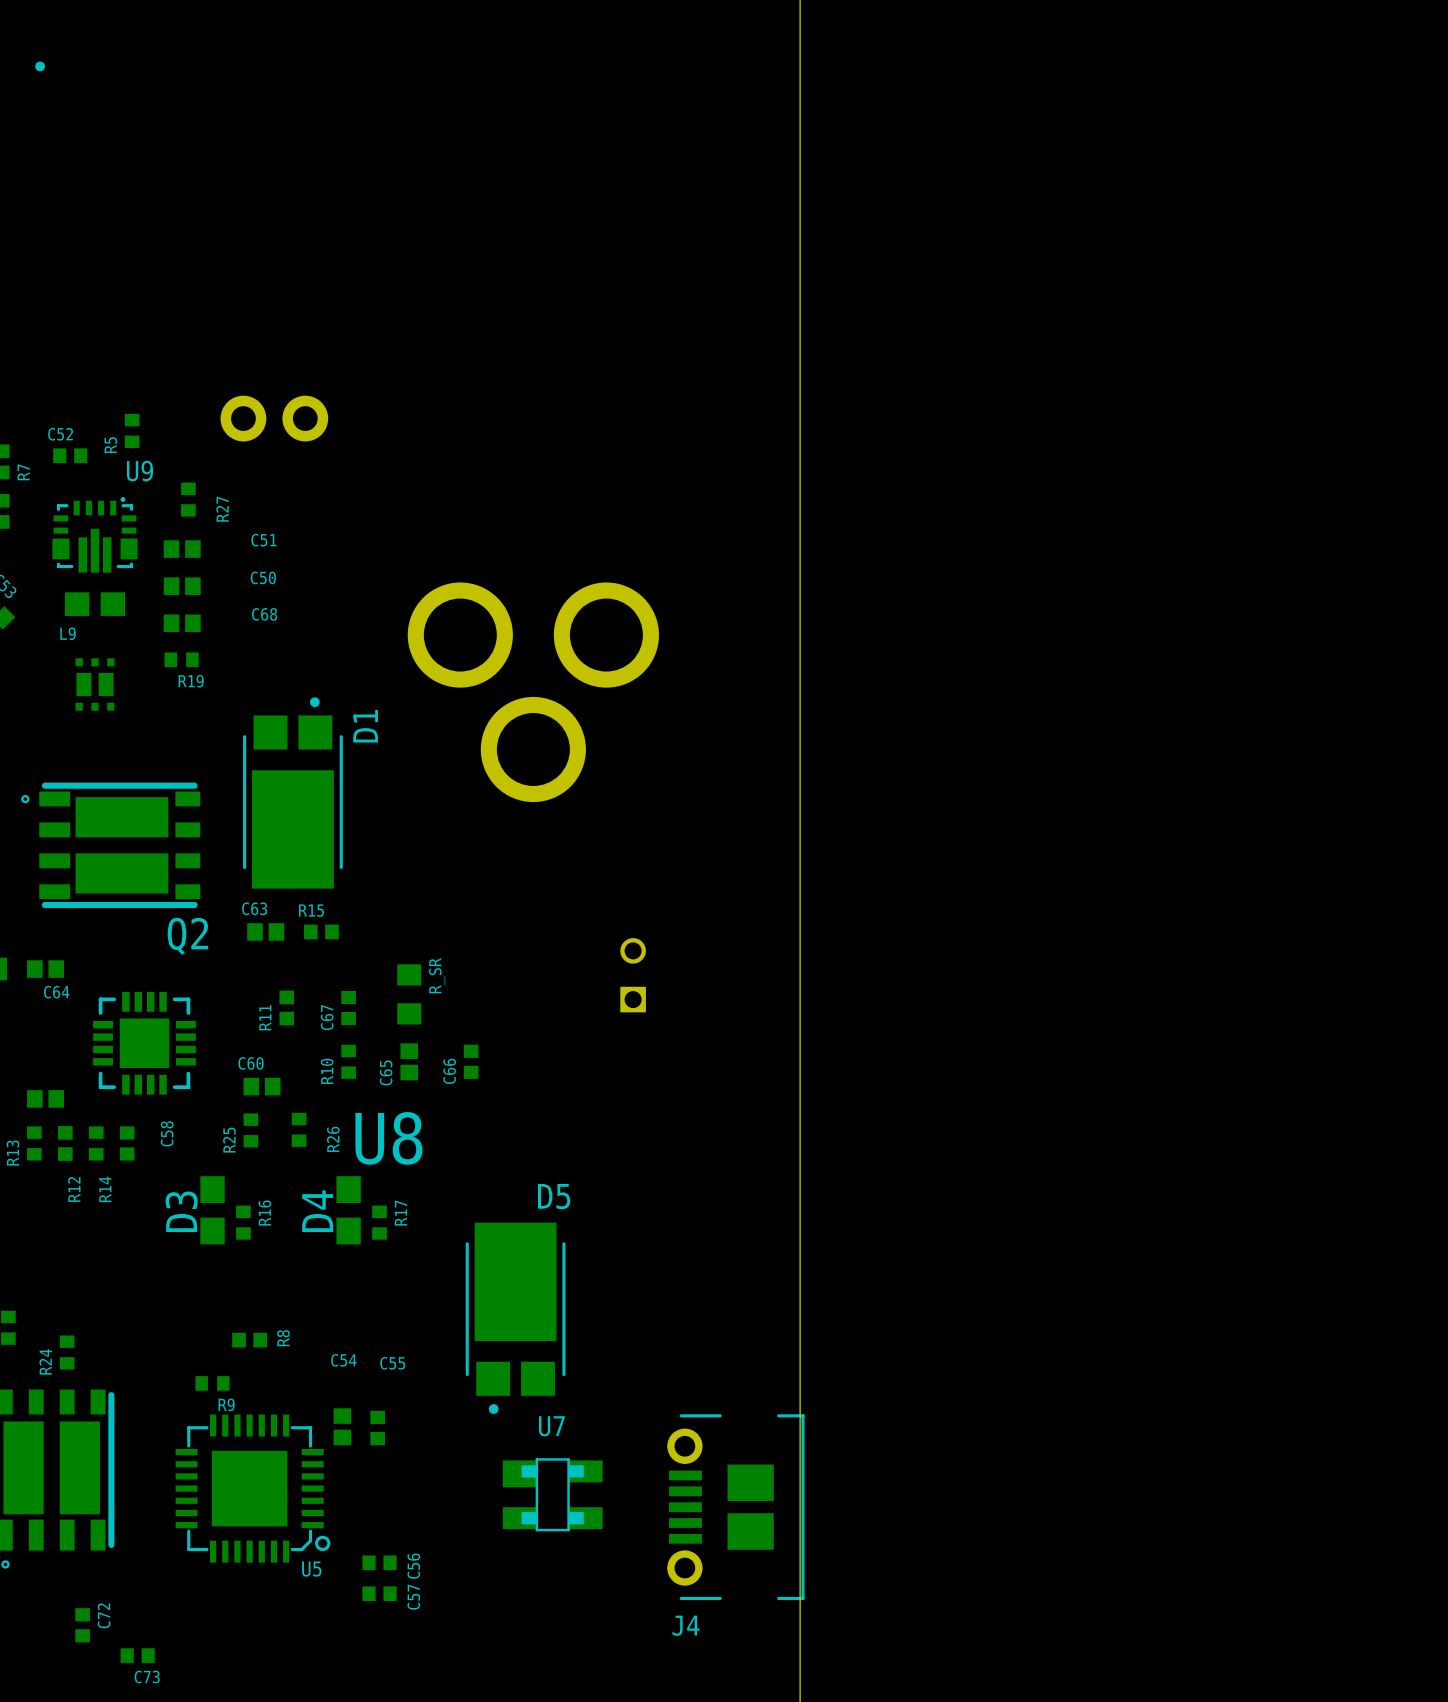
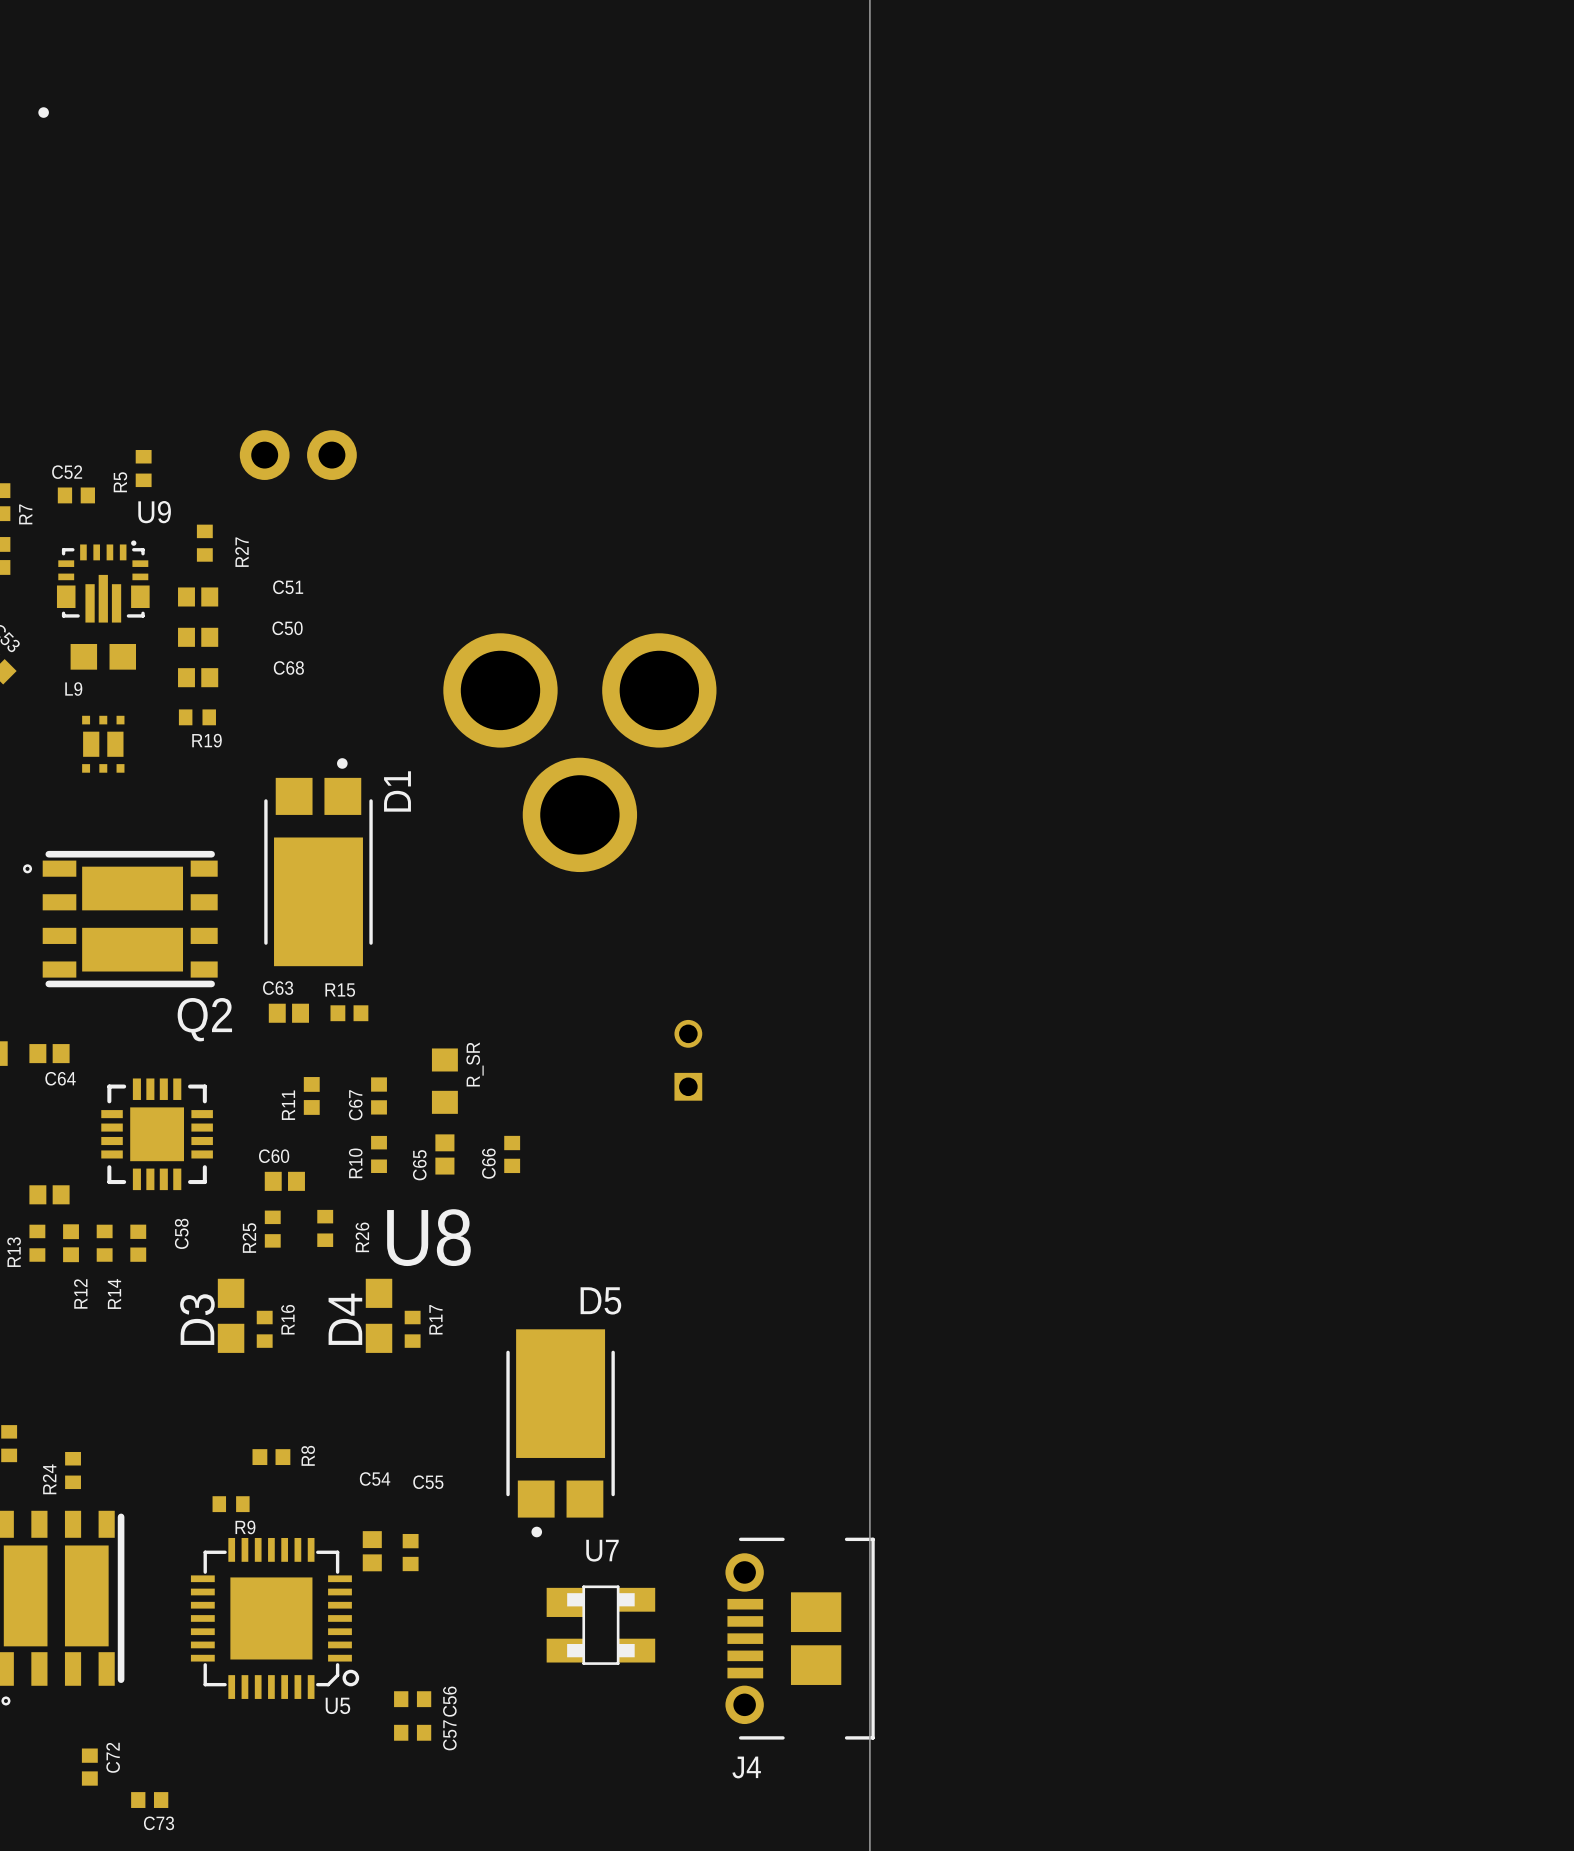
part position: (40, 66) -> (43, 112)

